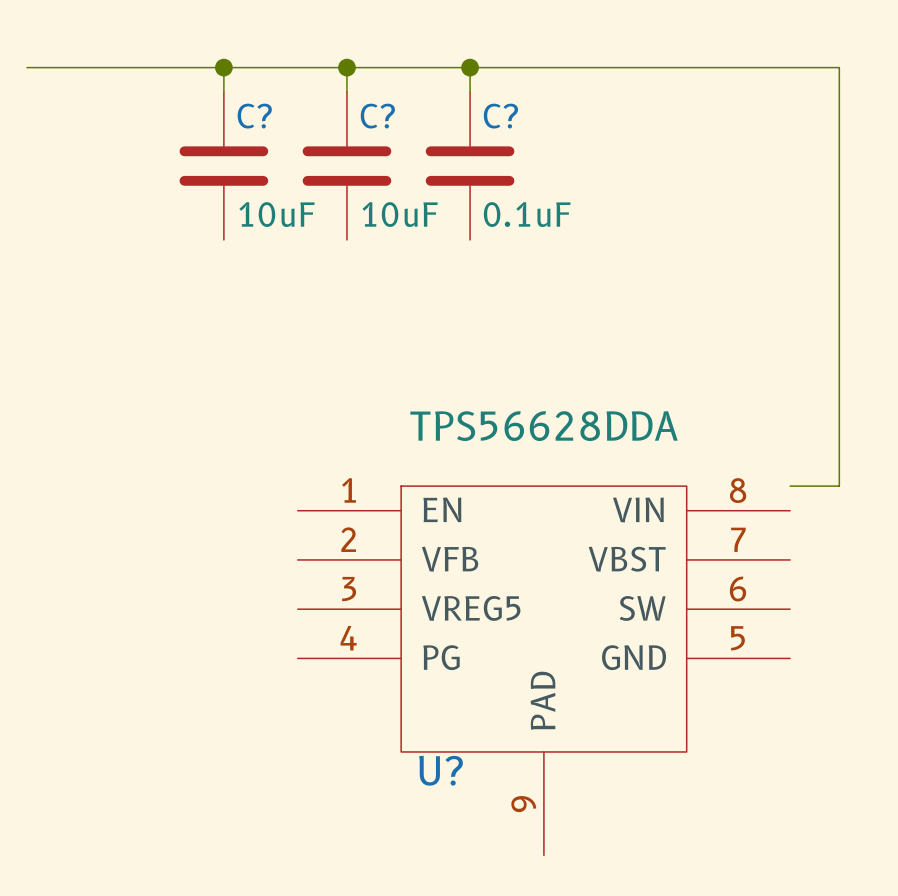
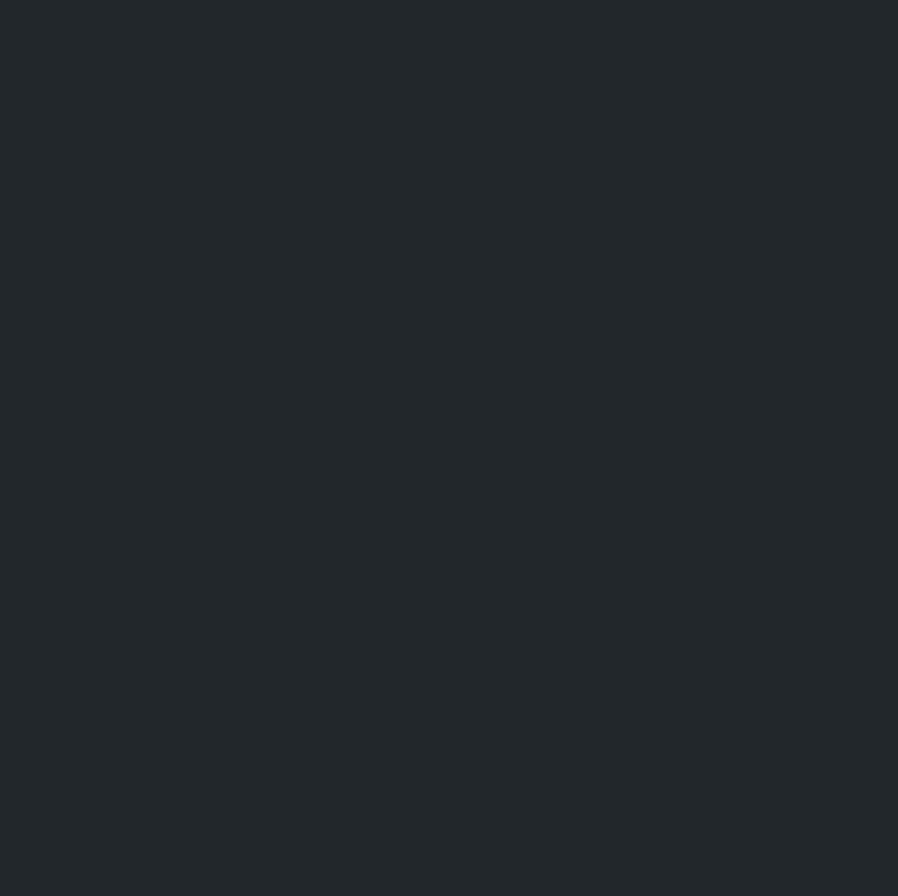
wire: (26, 67) (839, 67) (839, 486) (790, 486) -> none
wire: (223, 67) (223, 92) -> none
junction: (223, 67) -> none
wire: (346, 67) (346, 92) -> none
junction: (346, 67) -> none
wire: (470, 67) (470, 92) -> none
junction: (470, 67) -> none
C?: 10uF (223, 166) -> none
C?: 10uF (346, 166) -> none
C?: 0.1uF (470, 166) -> none
U?: TPS56628DDA (543, 670) -> none

